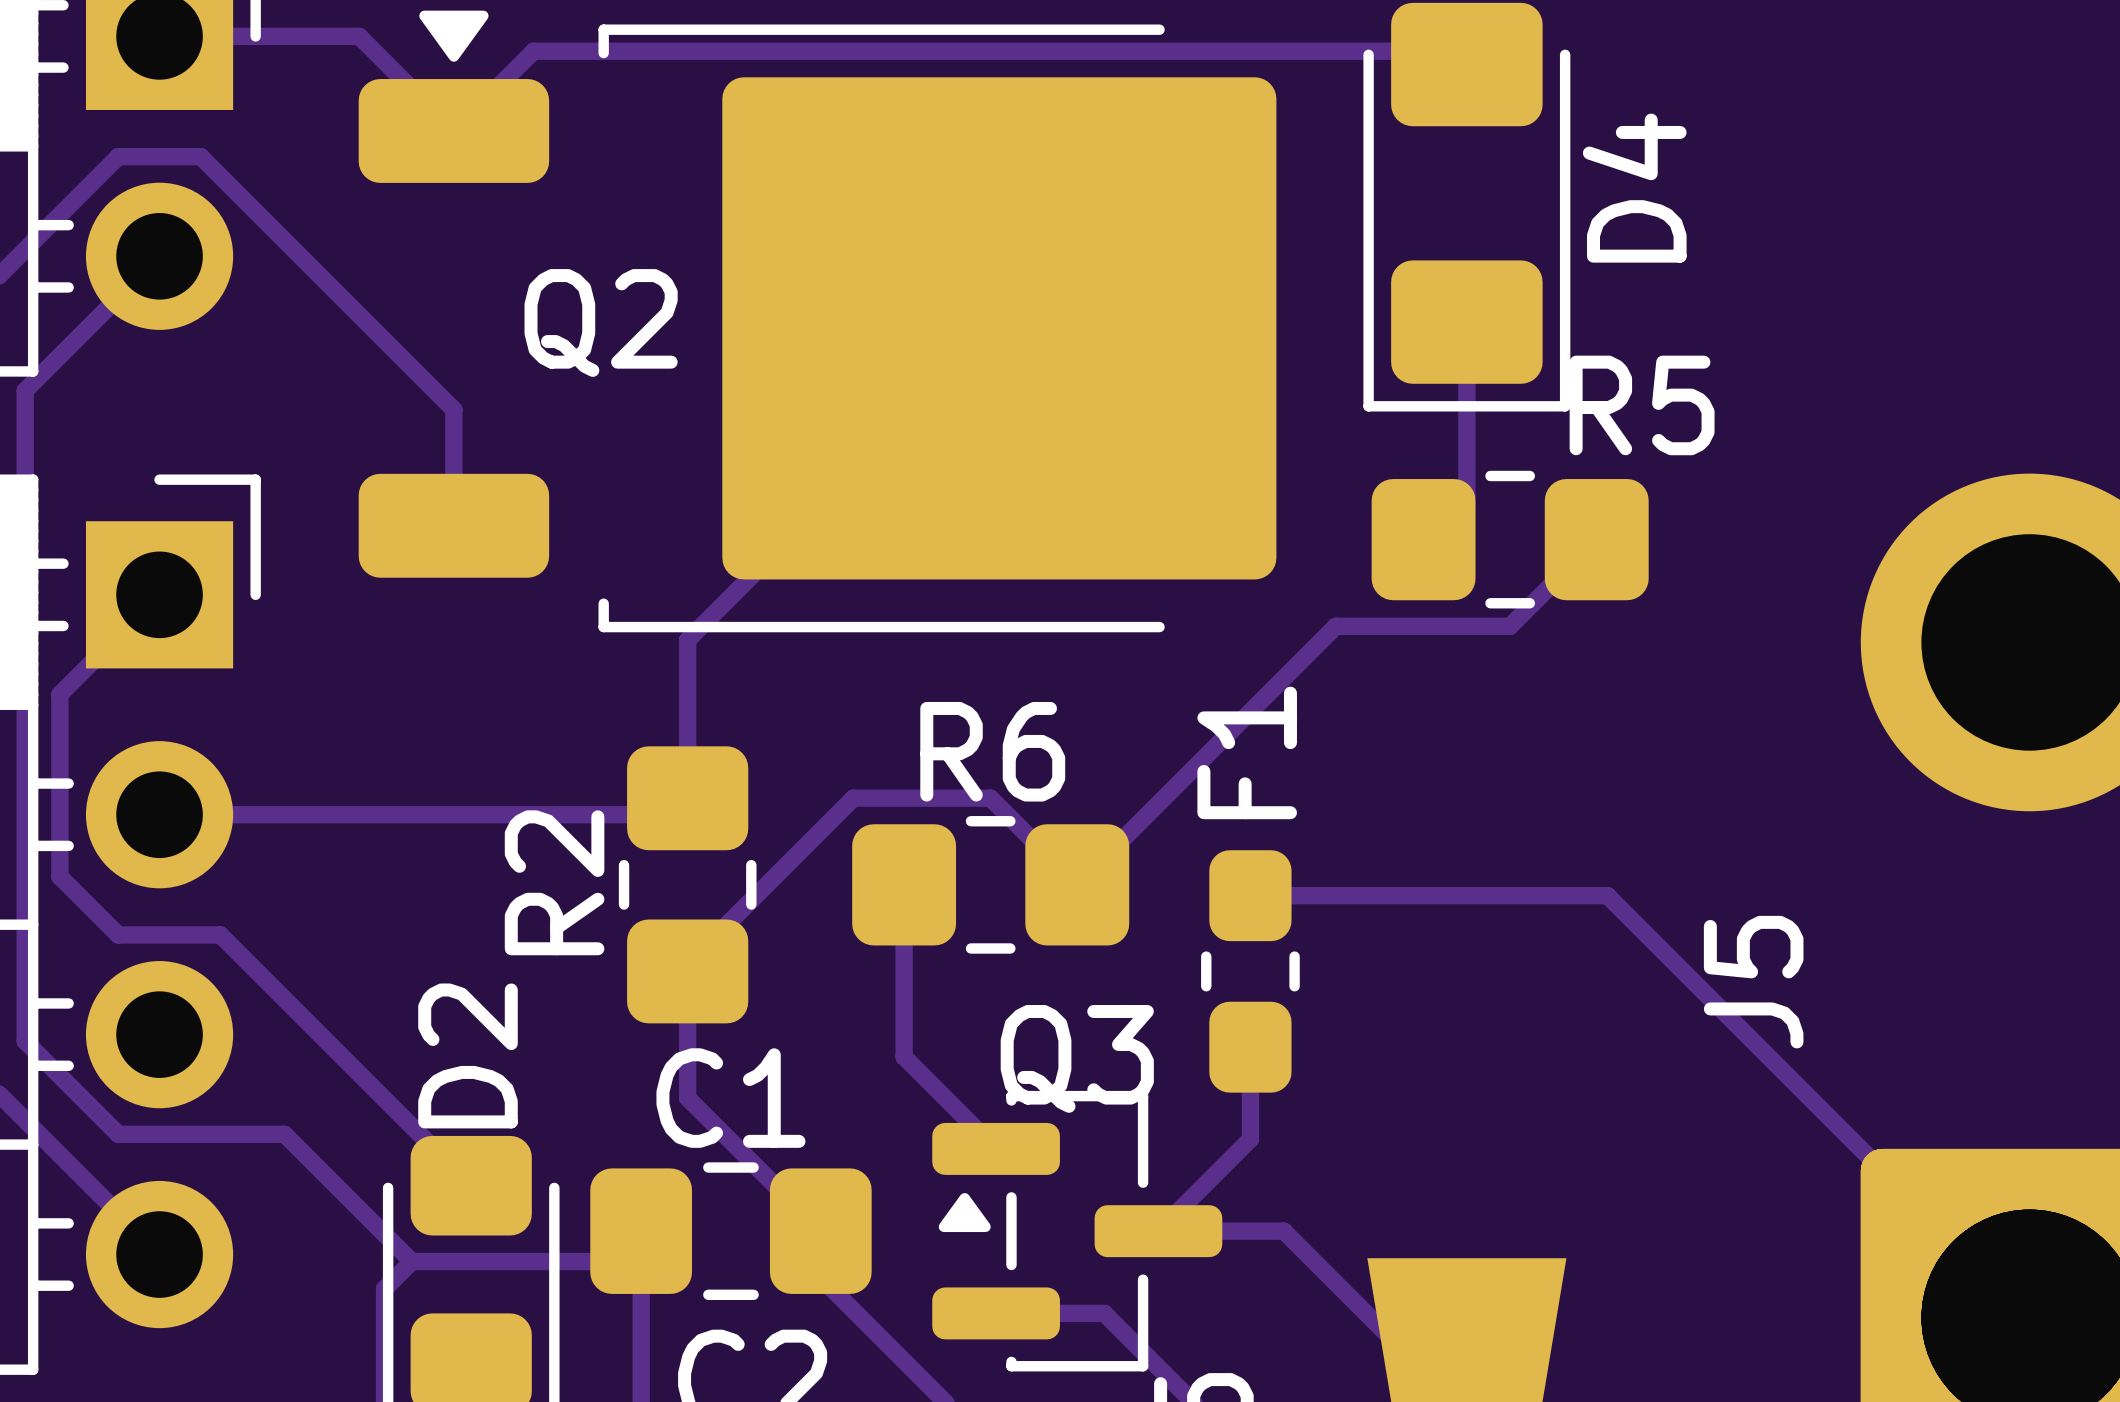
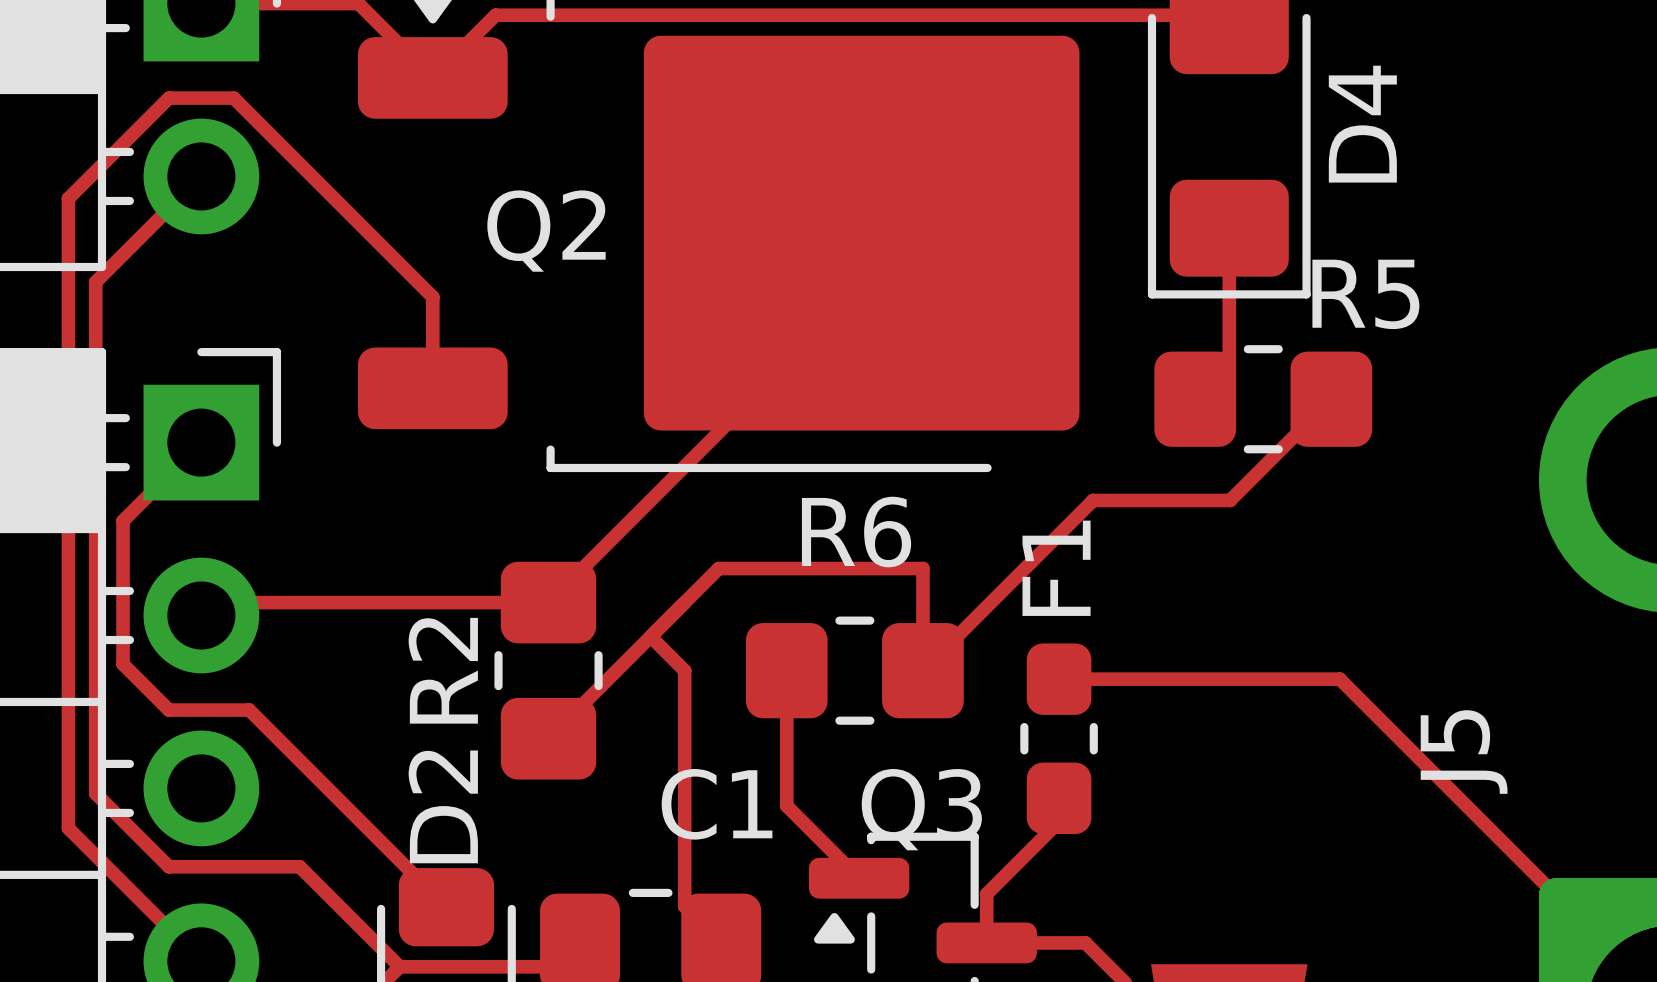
track: (999, 328) (687, 640) (687, 798) (671, 814) (159, 814) -> (861, 233) (861, 289) (548, 602) (214, 602) (201, 615)
track: (1510, 626) (1335, 626) (1293, 668) -> (1263, 467) (1230, 500) (1093, 500)
R6 name position: R6 (992, 751) -> R6 (856, 532)
track: none -> (650, 636) (684, 670) (684, 906)
R2 position: (687, 884) -> (548, 670)
track: (1077, 884) (990, 798) (853, 798) (687, 963) (687, 1098) (774, 1184) -> (922, 670) (922, 568) (718, 568) (548, 738)
track: (1250, 1076) (1250, 1139) (1158, 1231) -> (1059, 821) (986, 894) (986, 942)
C1 name position: C1 (730, 1098) -> C1 (717, 804)

